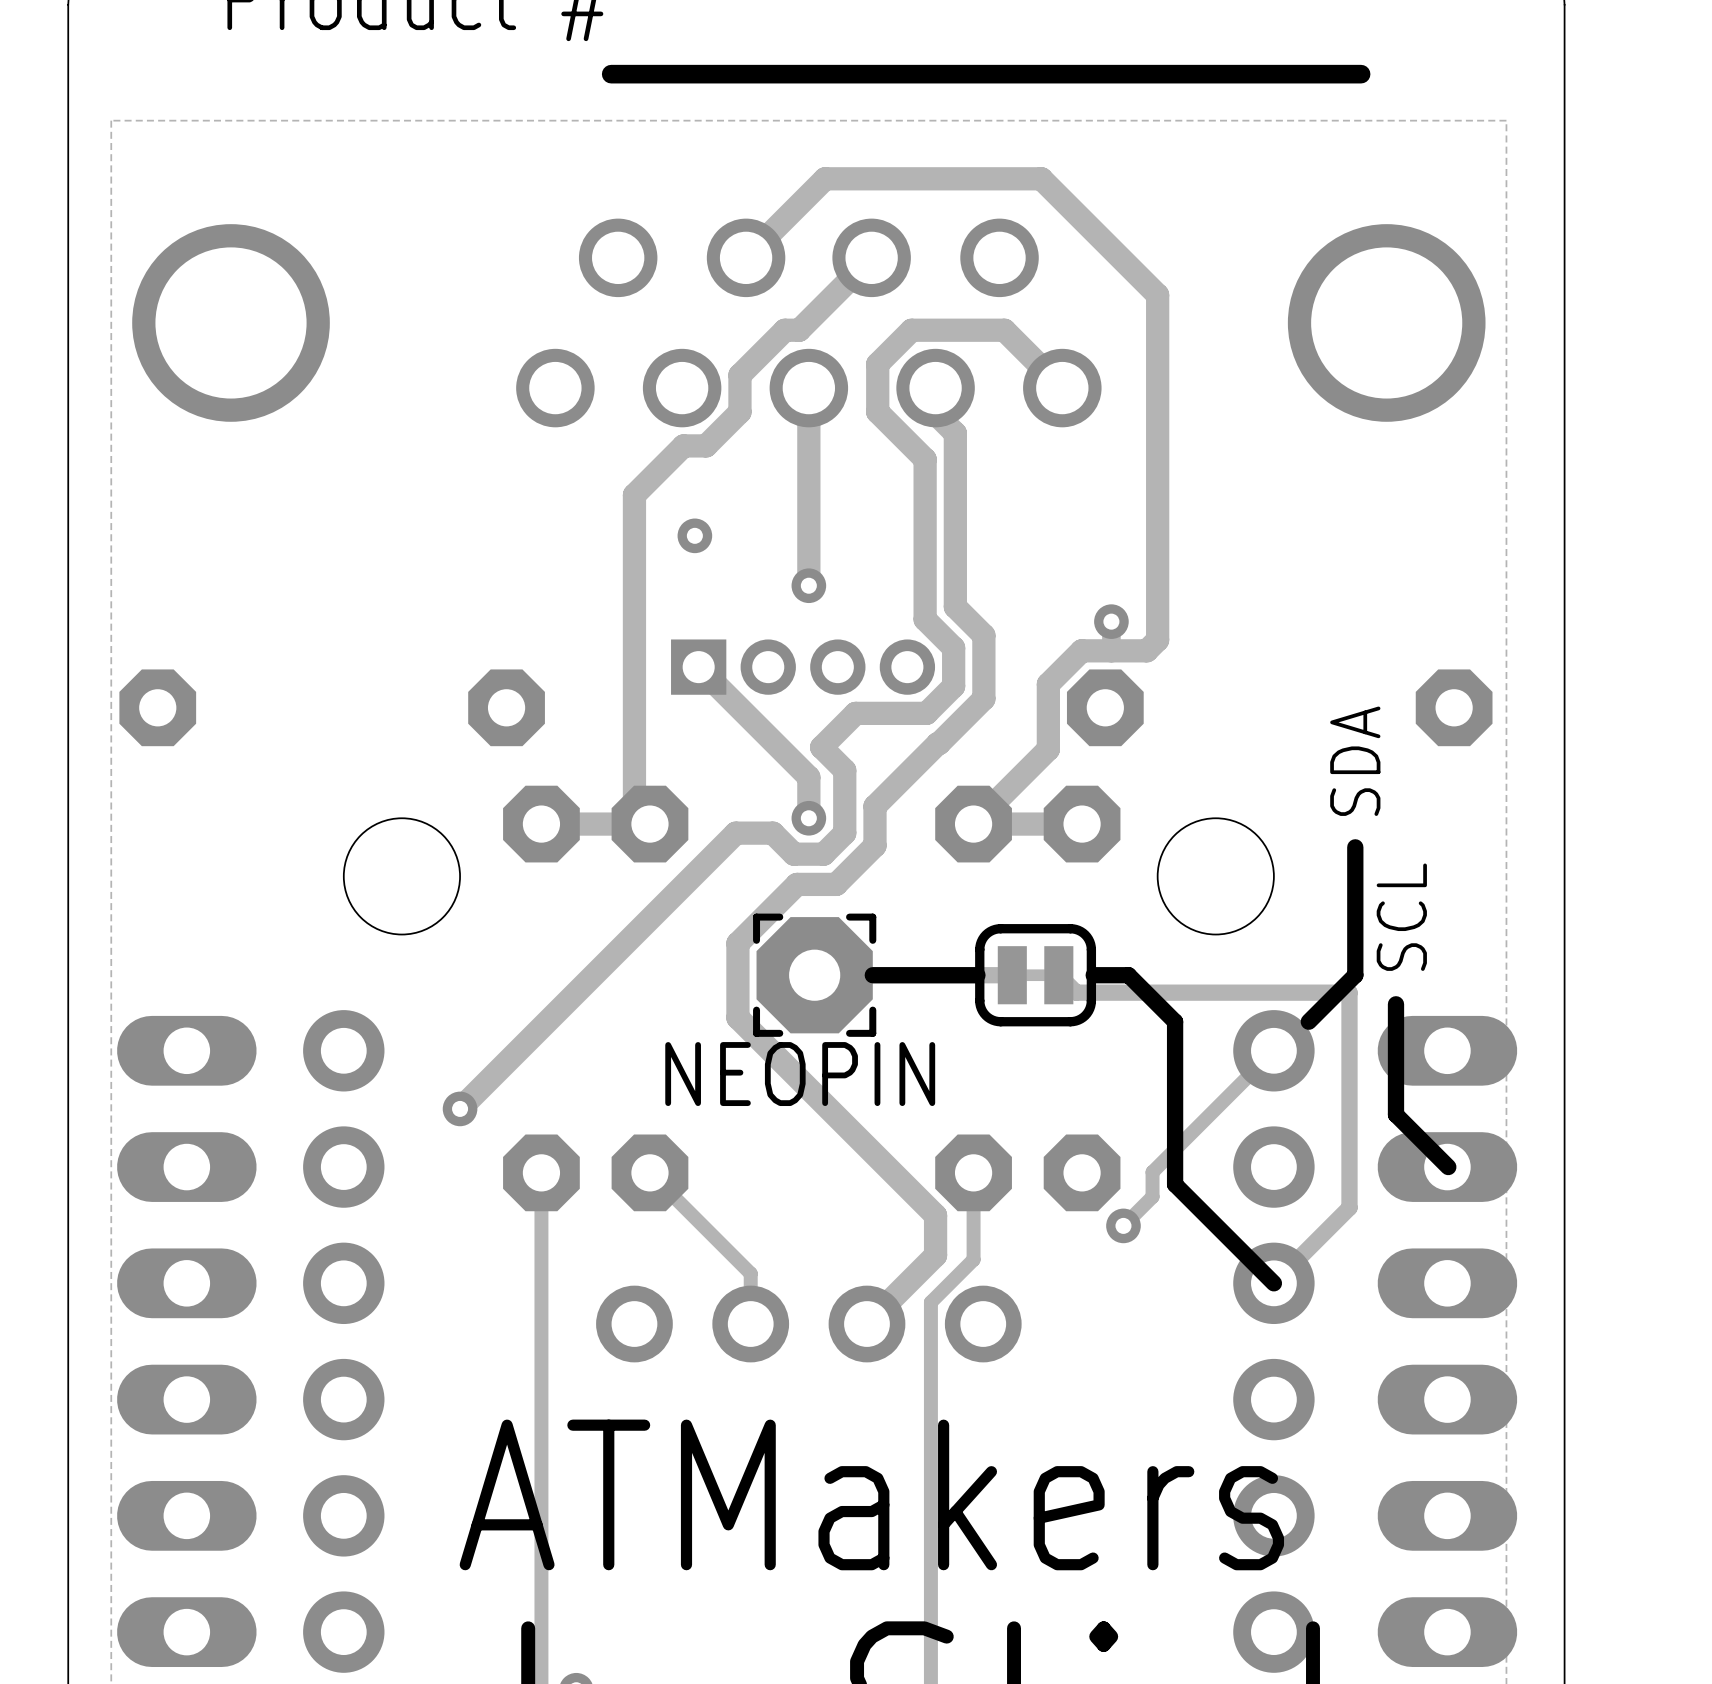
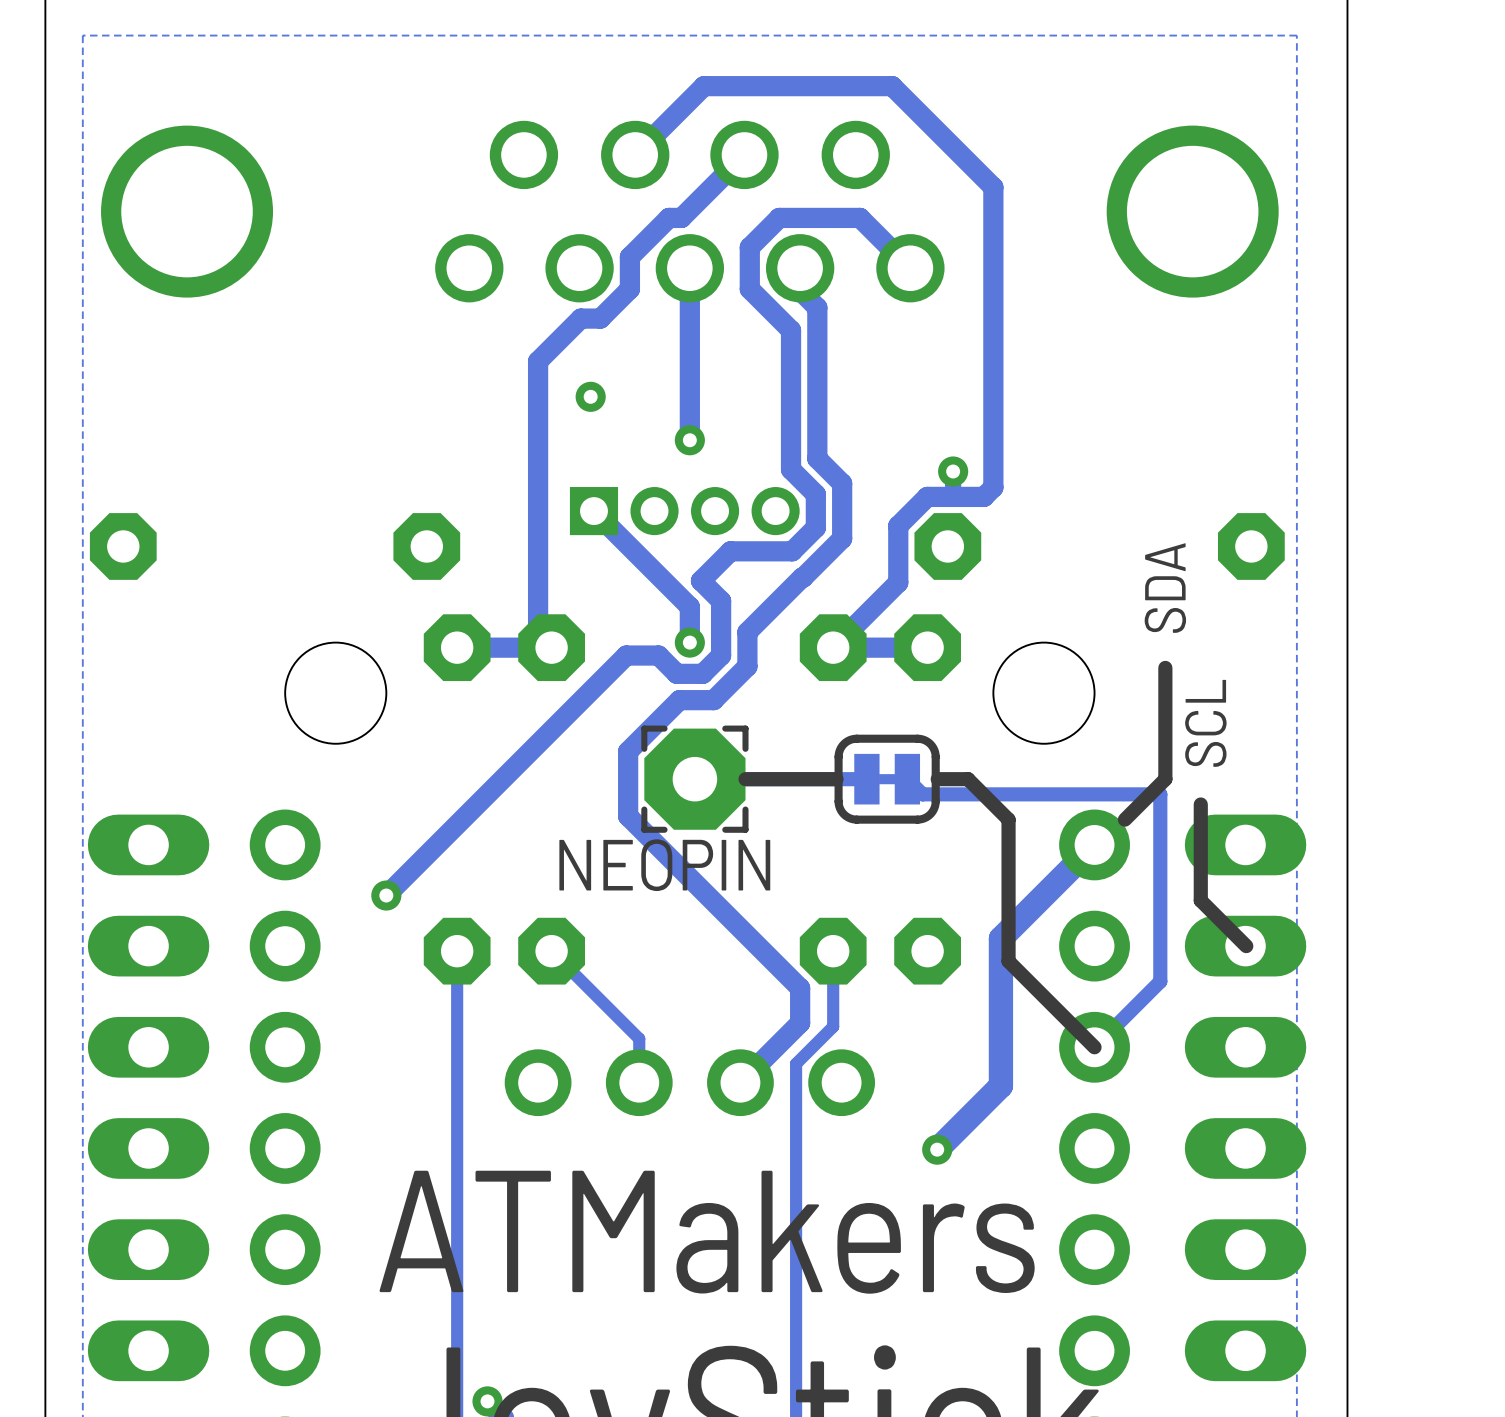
track width: thin (1273, 1050) (1166, 1158) -> thick (1094, 844) (1000, 938)
track: (1166, 1158) (1152, 1172) (1152, 1196) (1123, 1225) -> (1000, 938) (1000, 1085) (937, 1149)
via position: (1123, 1225) -> (937, 1149)

